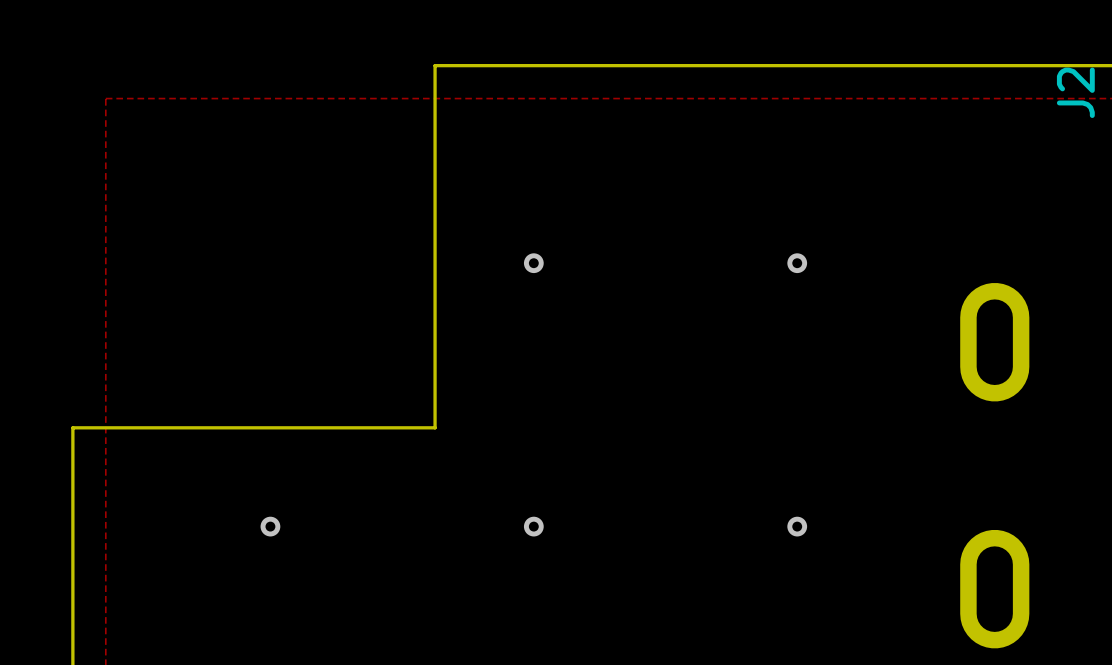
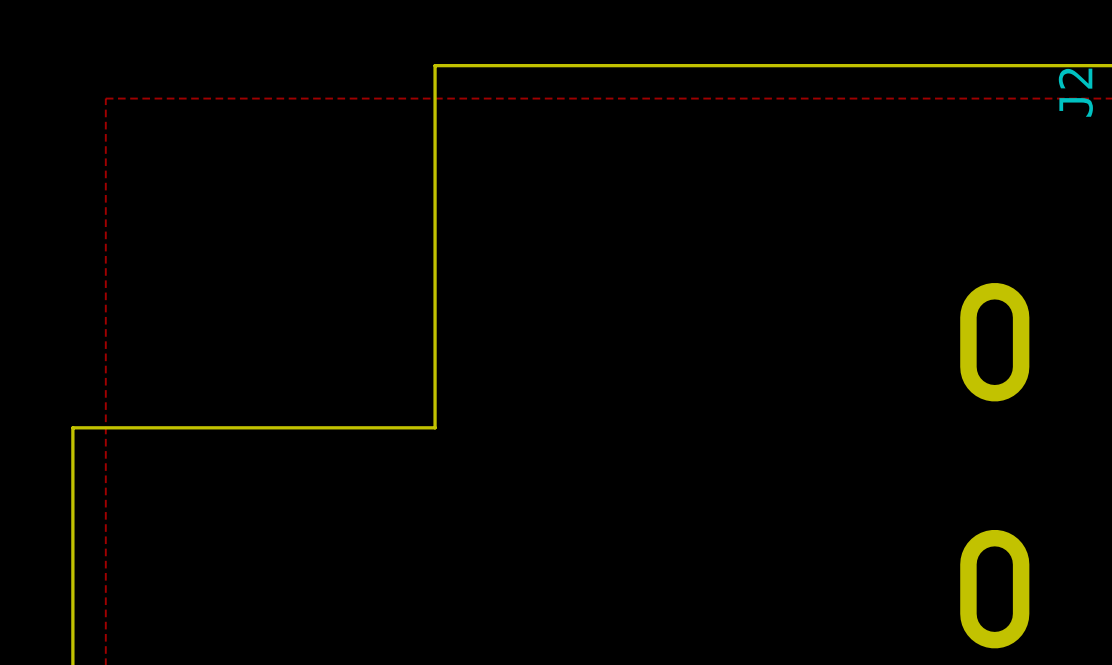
via: (533, 263) -> none
via: (797, 263) -> none
via: (270, 526) -> none
via: (533, 526) -> none
via: (797, 526) -> none

